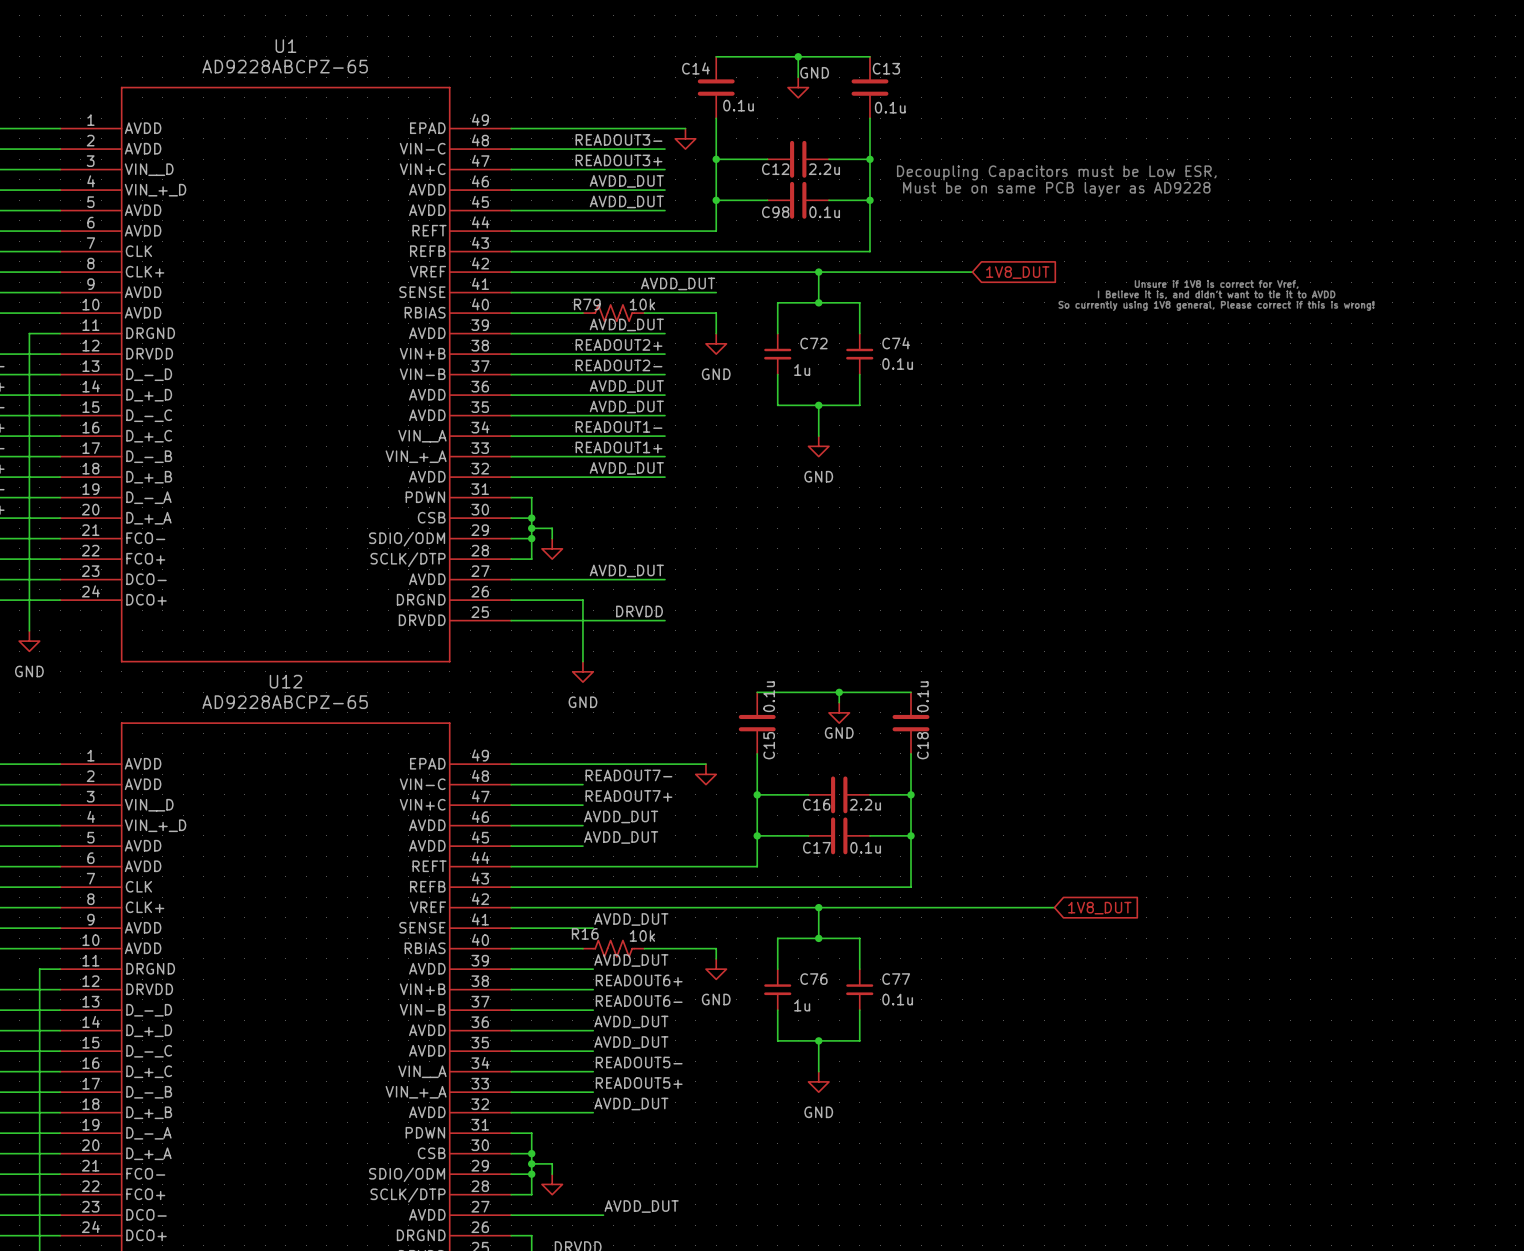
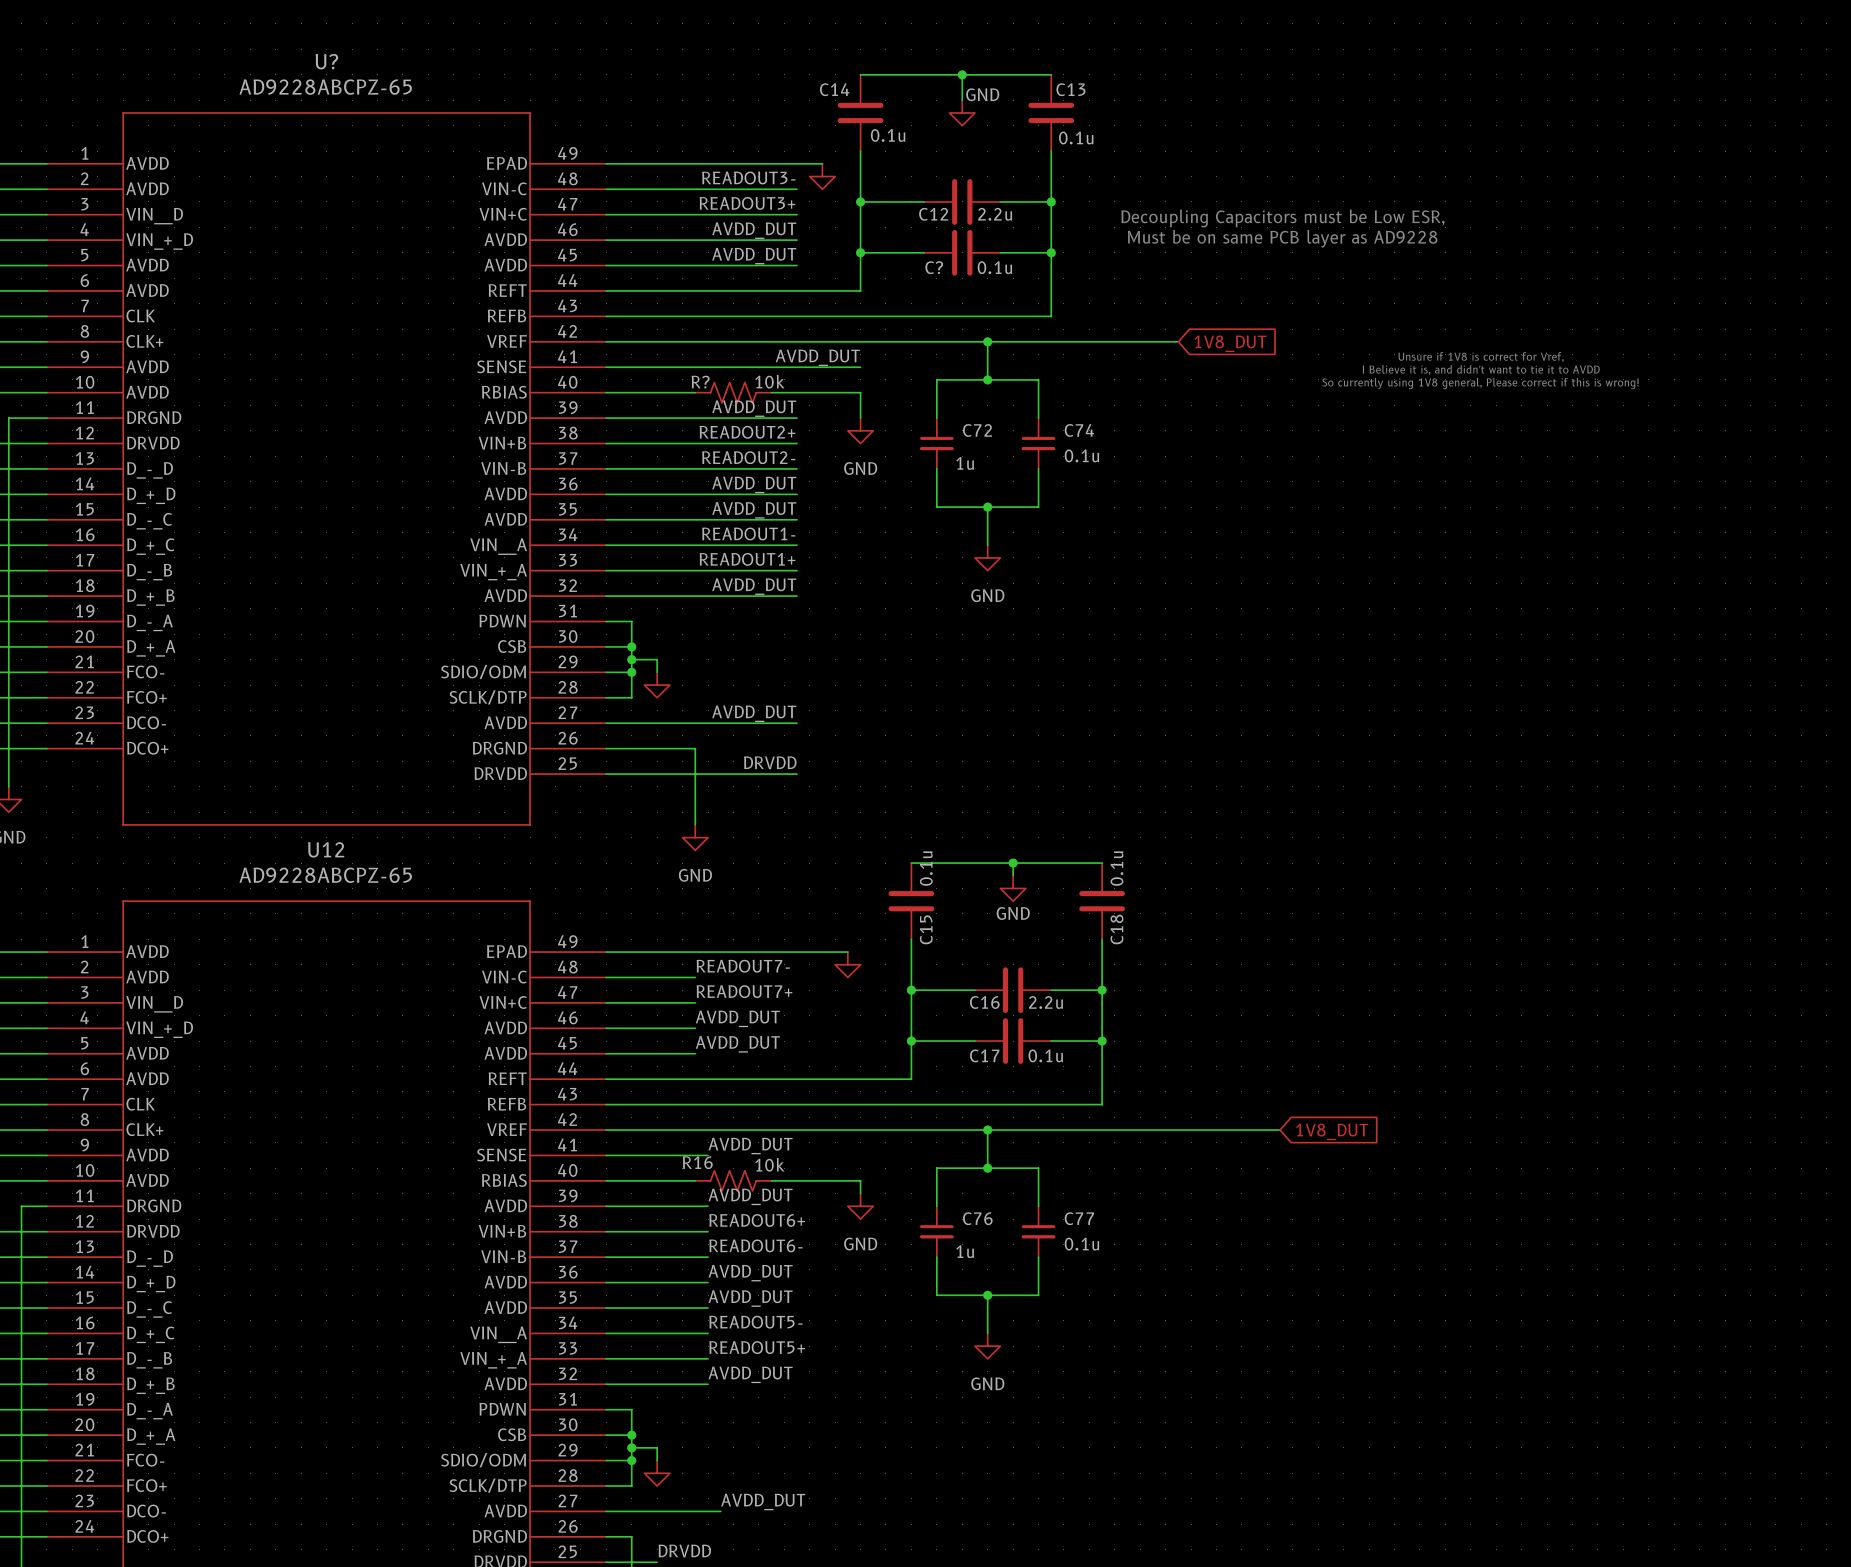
U1 name: U1 (285, 46) -> U? (326, 61)
C98 name: C98 (775, 212) -> C? (934, 267)
R79 name: R79 (587, 304) -> R? (700, 382)

